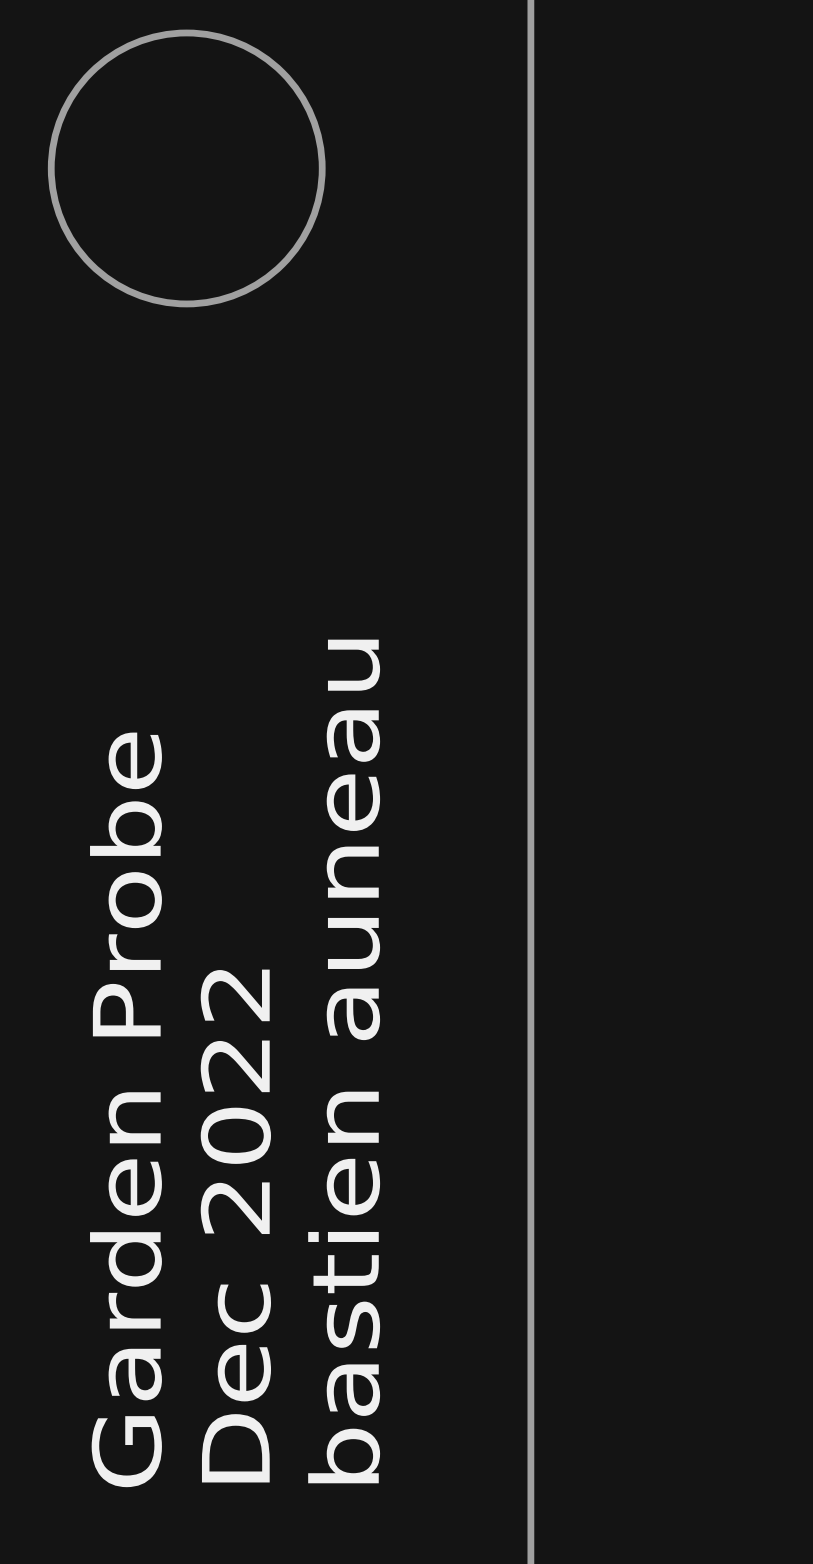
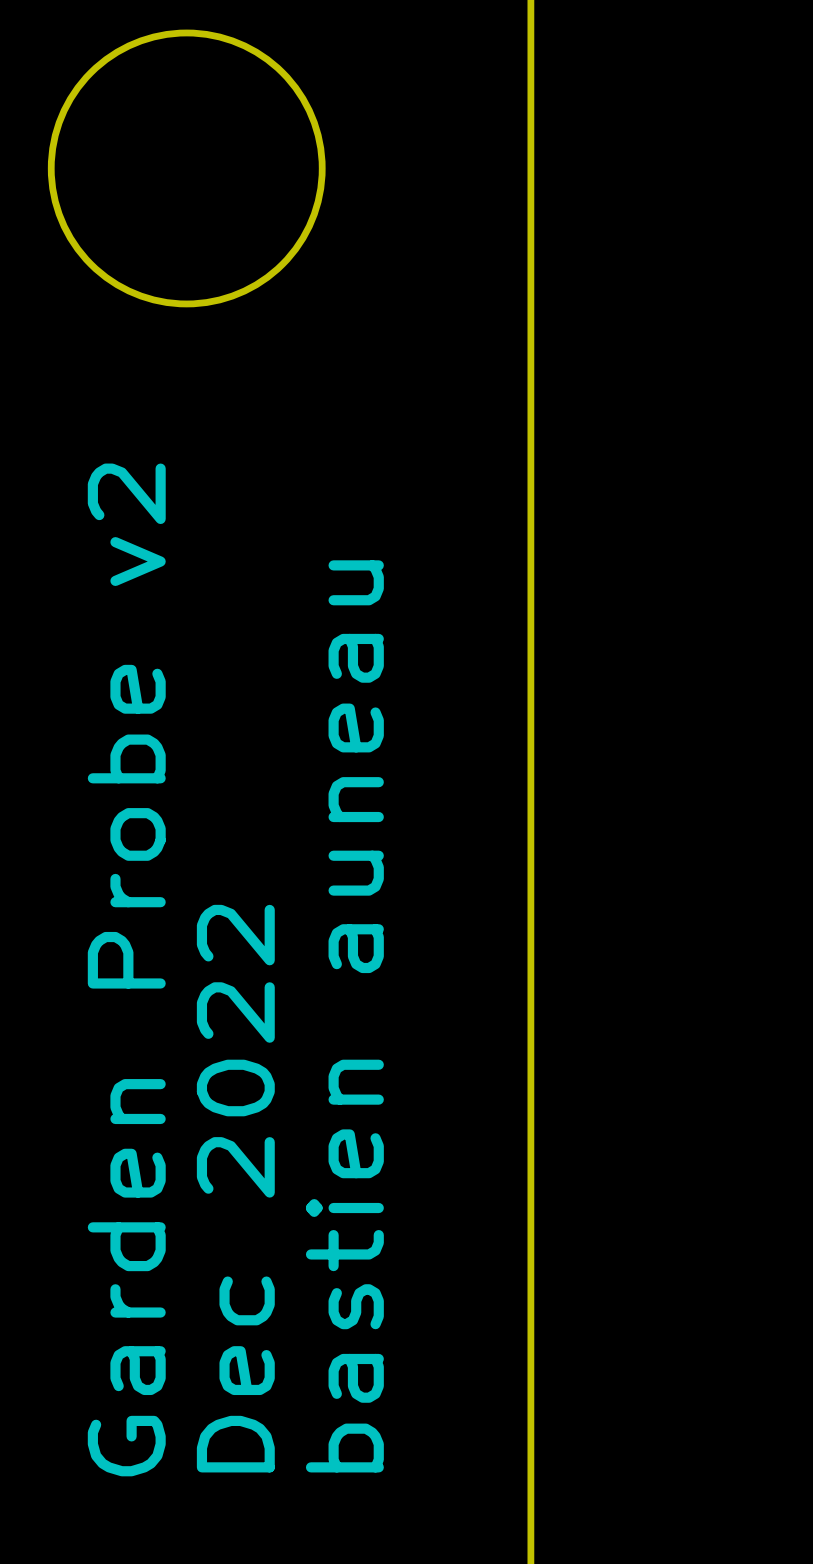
text: Garden Probe (125, 1109) -> Garden Probe v2 (126, 969)

